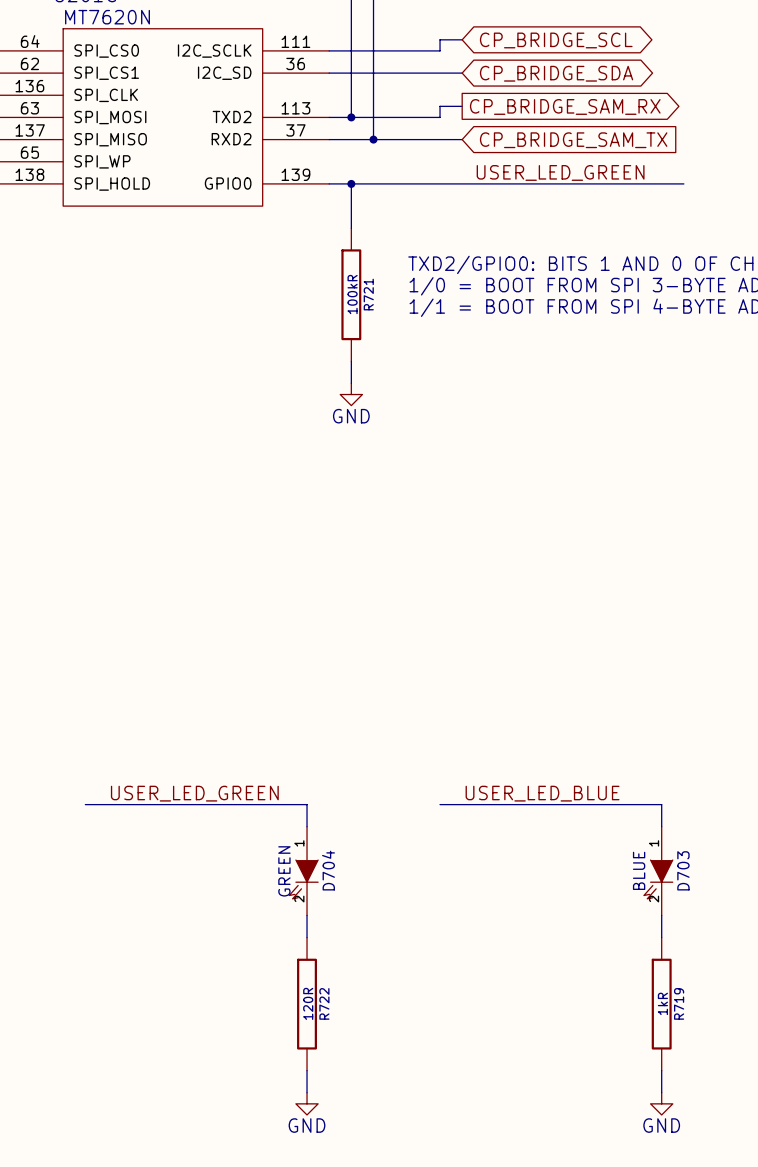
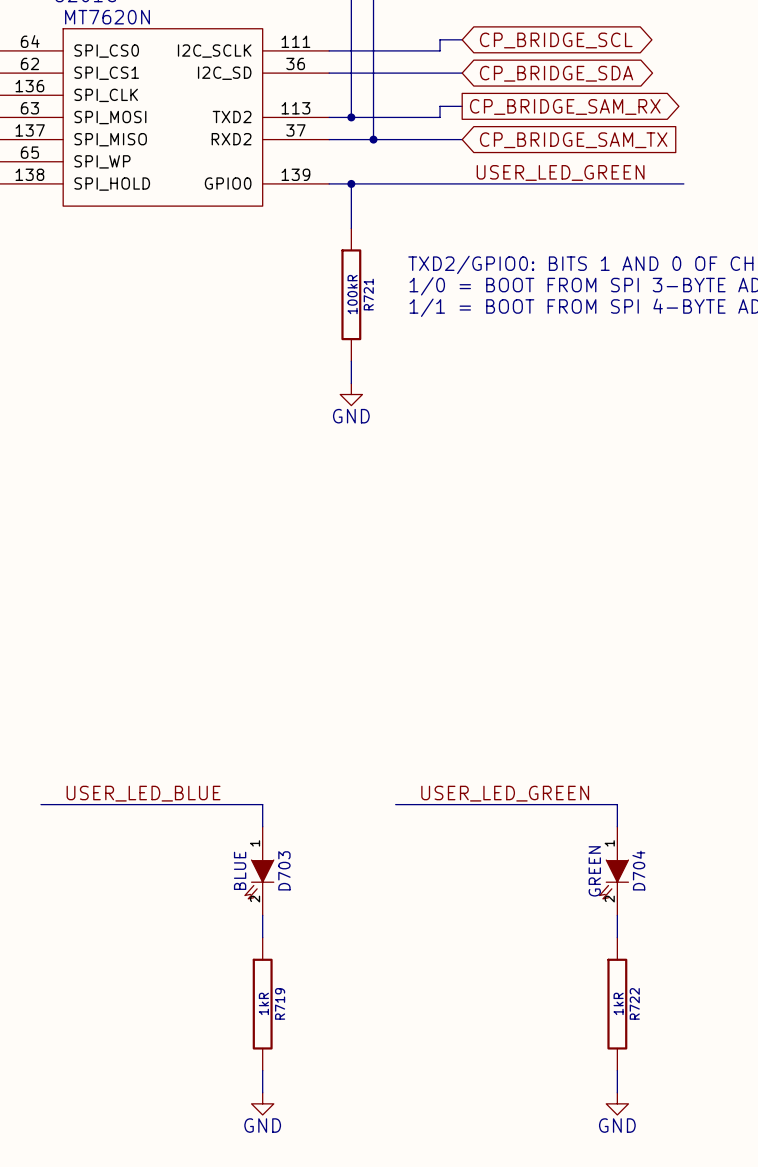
label: USER_LED_GREEN (194, 793) -> USER_LED_BLUE (143, 793)
label: USER_LED_BLUE (542, 793) -> USER_LED_GREEN (505, 793)
wire: none -> (41, 804) (85, 804)
wire: (262, 804) (307, 804) (307, 826) -> (262, 804) (262, 826)
wire: none -> (395, 804) (440, 804)
wire: (617, 804) (661, 804) (661, 826) -> (617, 804) (617, 826)
D704 position: (303, 871) -> (614, 871)
D703 position: (658, 871) -> (259, 871)
wire: (307, 915) (307, 937) -> (262, 915) (262, 937)
wire: (661, 915) (661, 937) -> (617, 915) (617, 937)
R722 value: 120R (308, 1003) -> 1kR (618, 1003)
R722 position: (307, 1004) -> (617, 1004)
R719 position: (661, 1004) -> (262, 1004)
wire: (307, 1070) (307, 1092) -> (262, 1070) (262, 1092)
wire: (661, 1070) (661, 1092) -> (617, 1070) (617, 1092)
power symbol position: GND (307, 1103) -> GND (262, 1103)
power symbol position: GND (661, 1103) -> GND (617, 1103)

